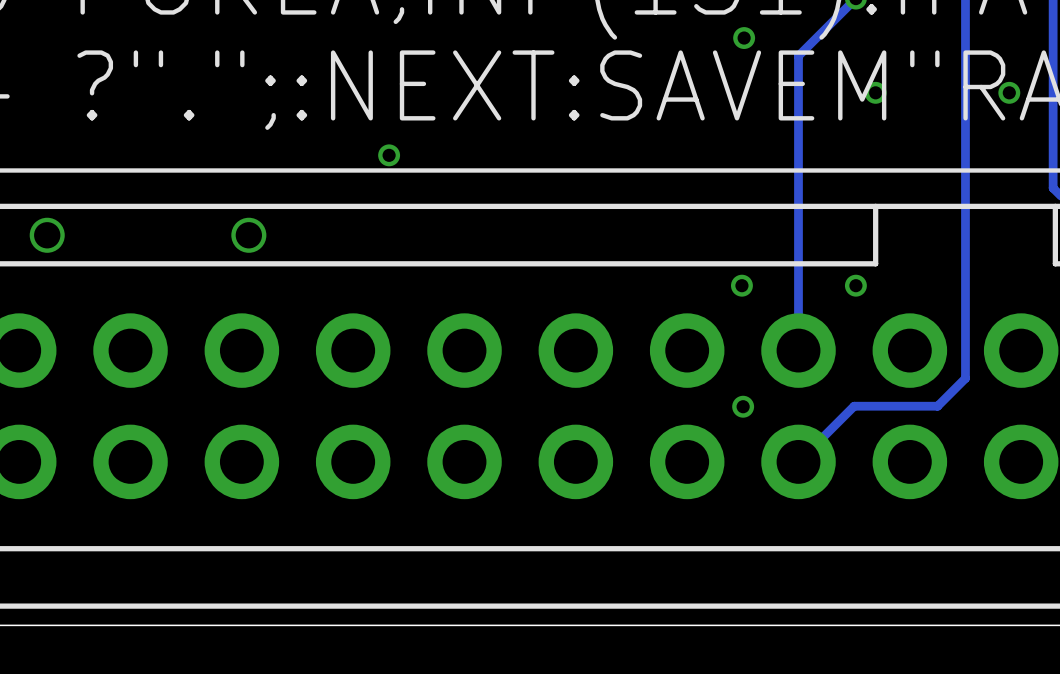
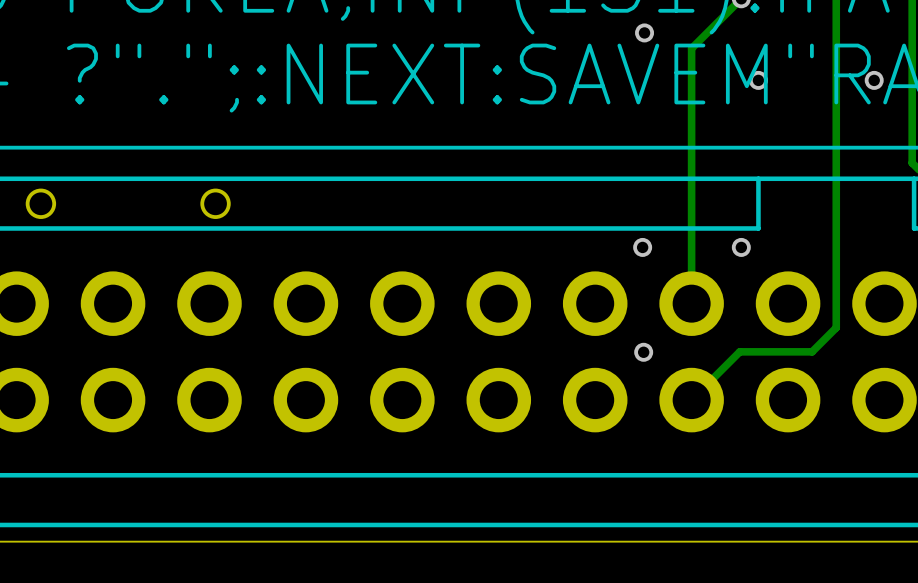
via: (389, 155) -> none

